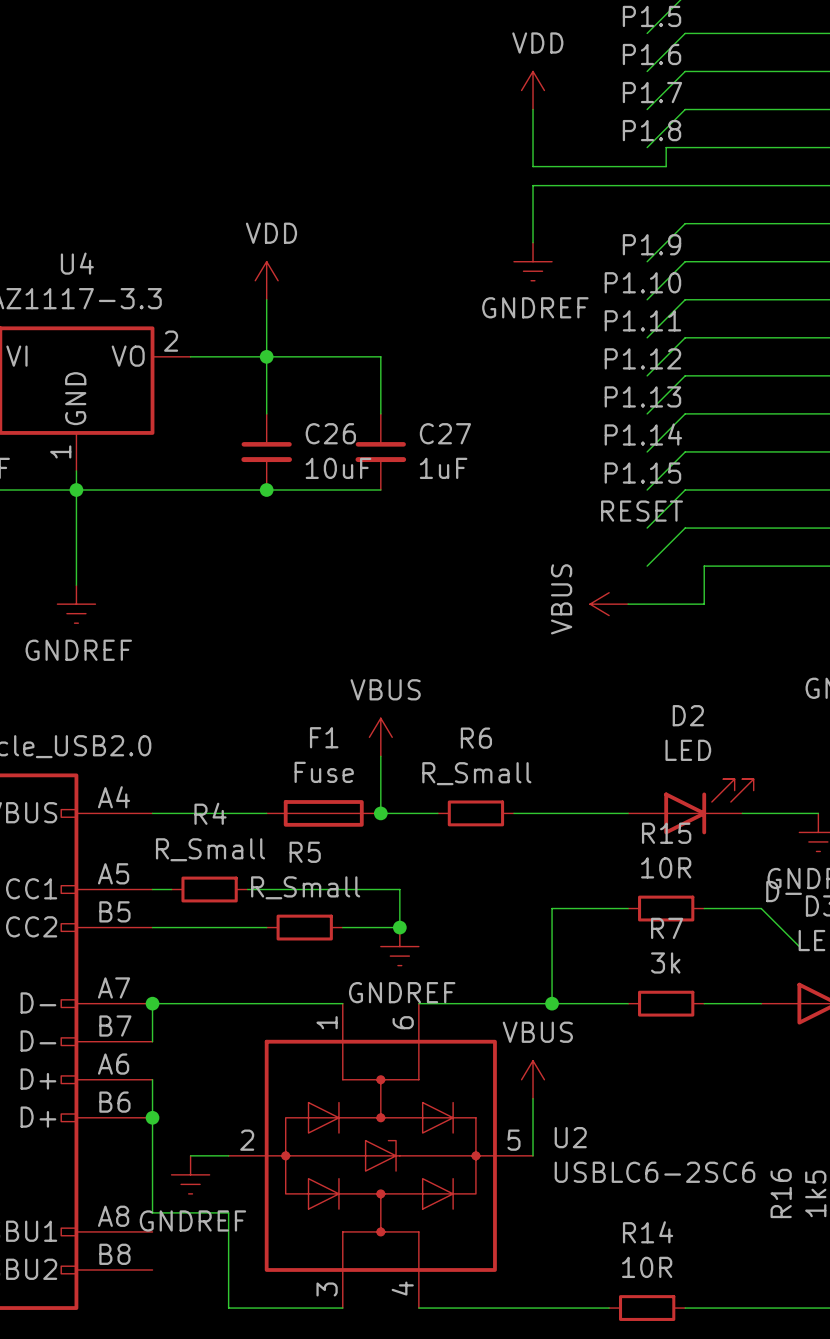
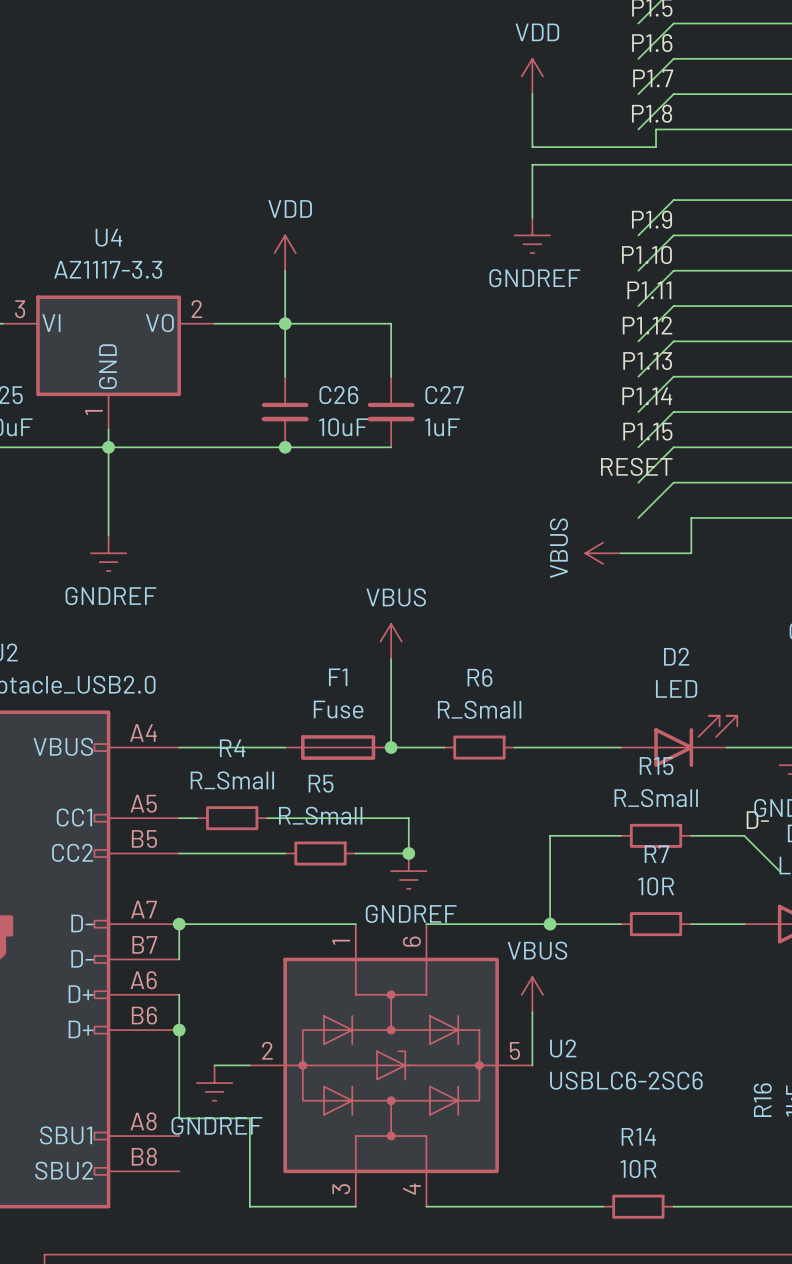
power symbol position: VBUS (380, 737) -> VBUS (391, 641)
R15 value: 10R (666, 867) -> R_Small (656, 798)
R7 value: 3k (665, 962) -> 10R (656, 886)

